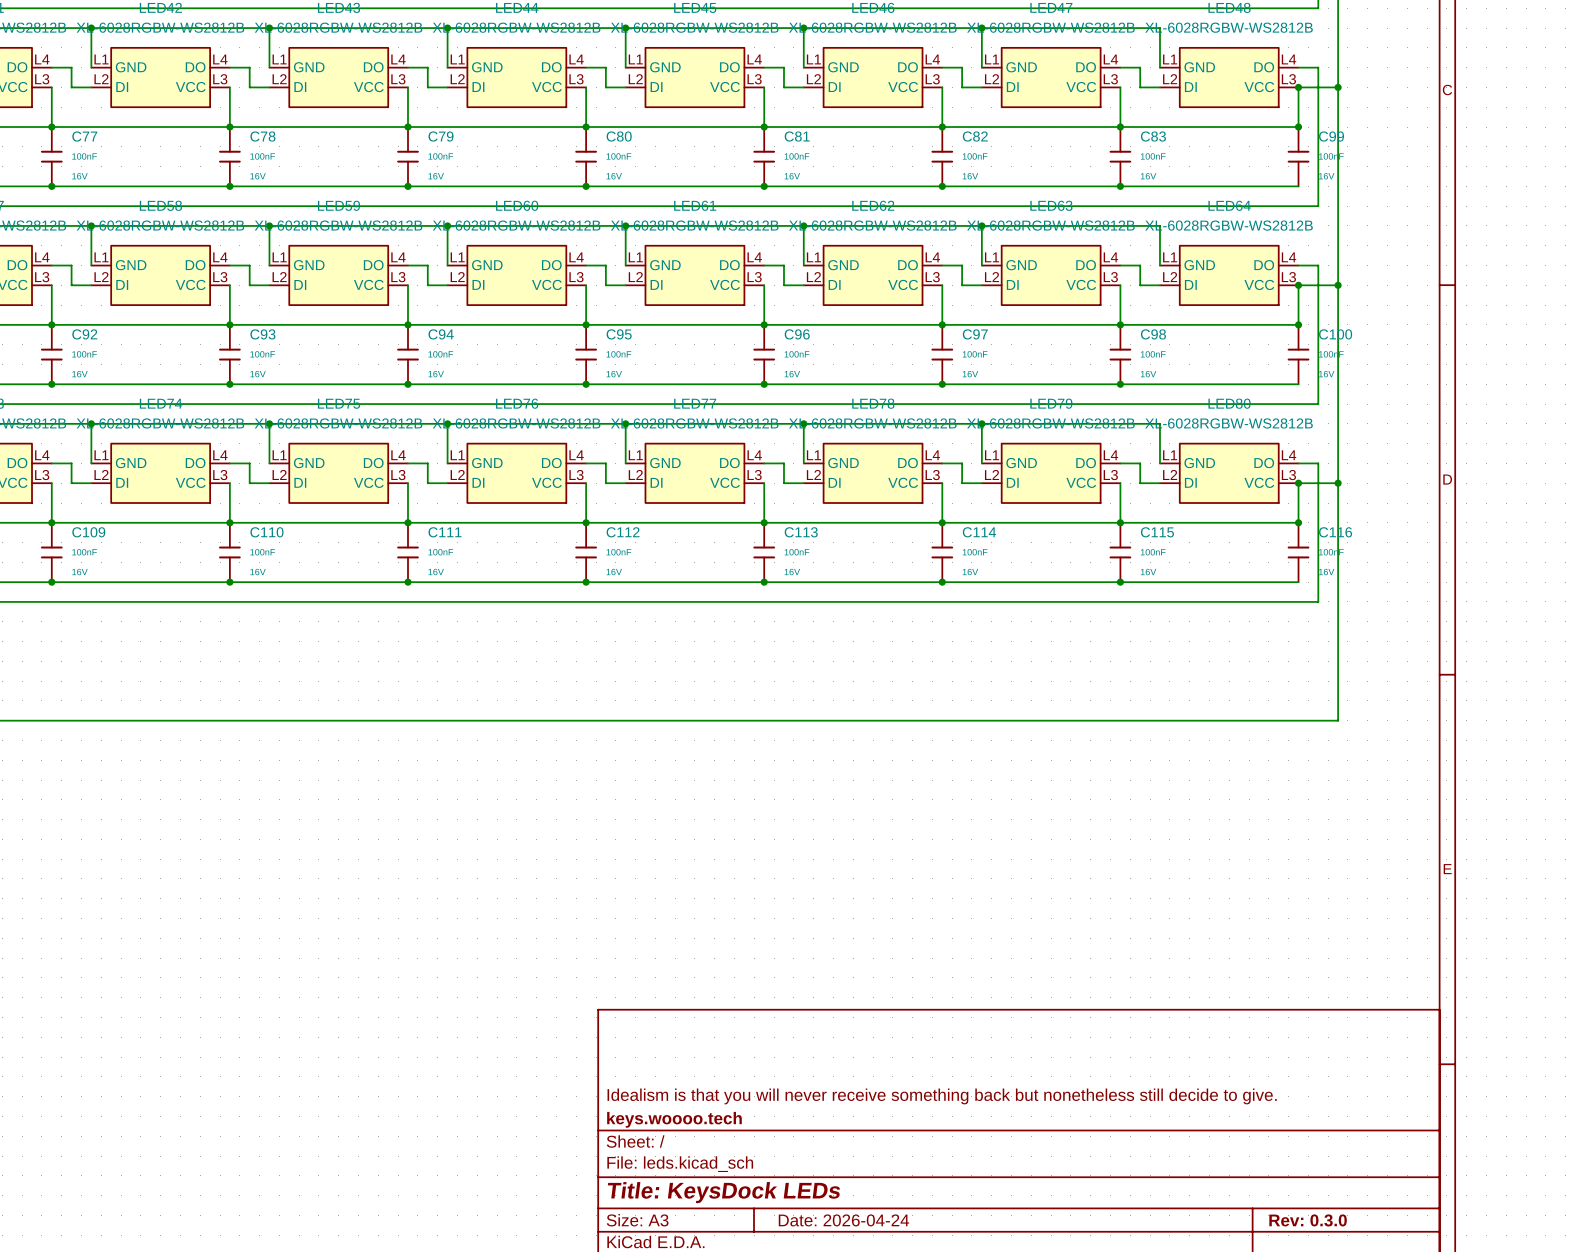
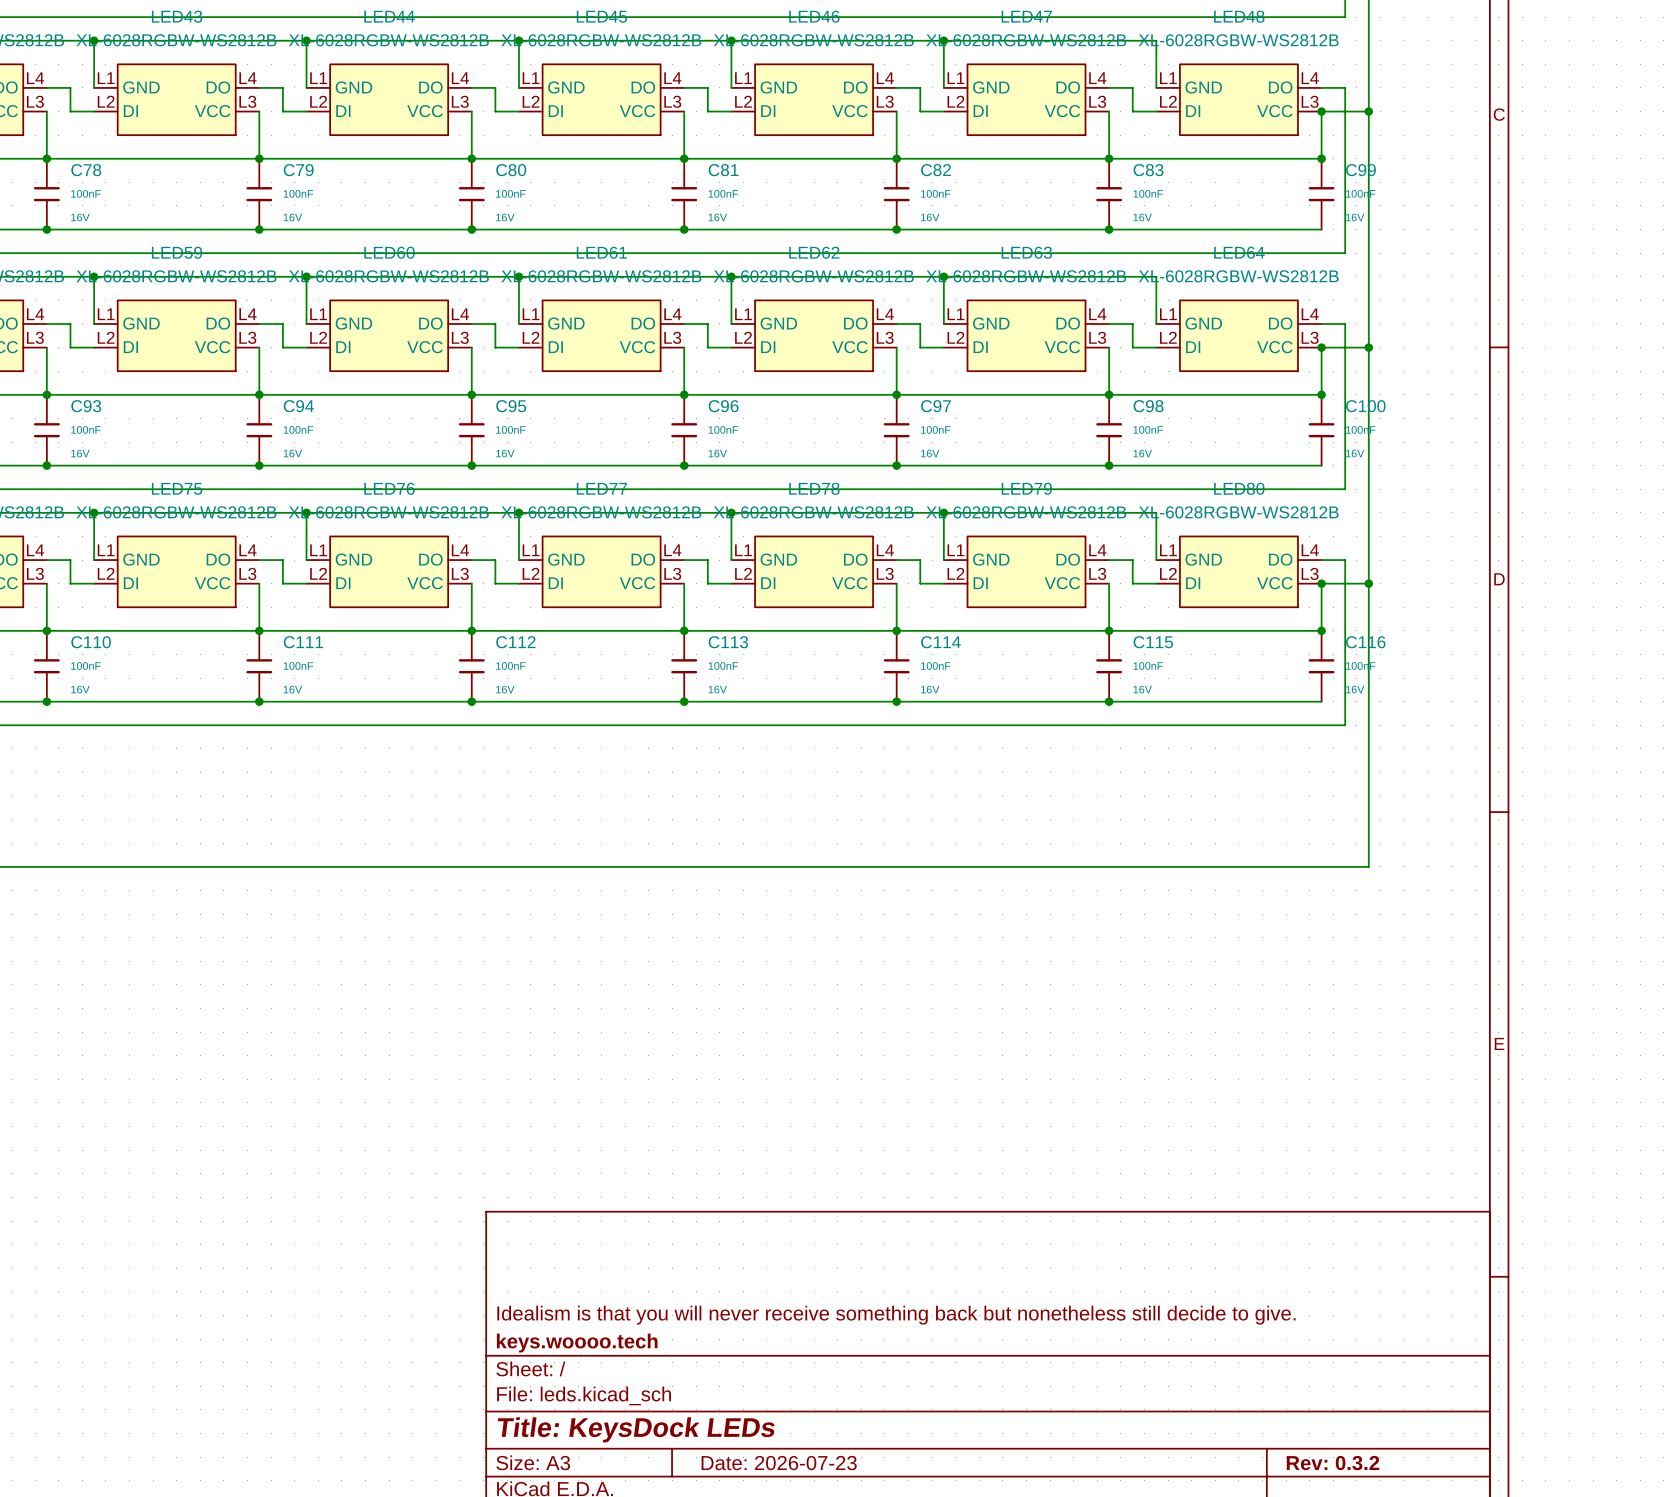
title block: Date: 2026-04-24 (843, 1220) -> Date: 2026-07-23 (779, 1463)
title block: Rev: 0.3.0 (1308, 1220) -> Rev: 0.3.2 (1333, 1463)

